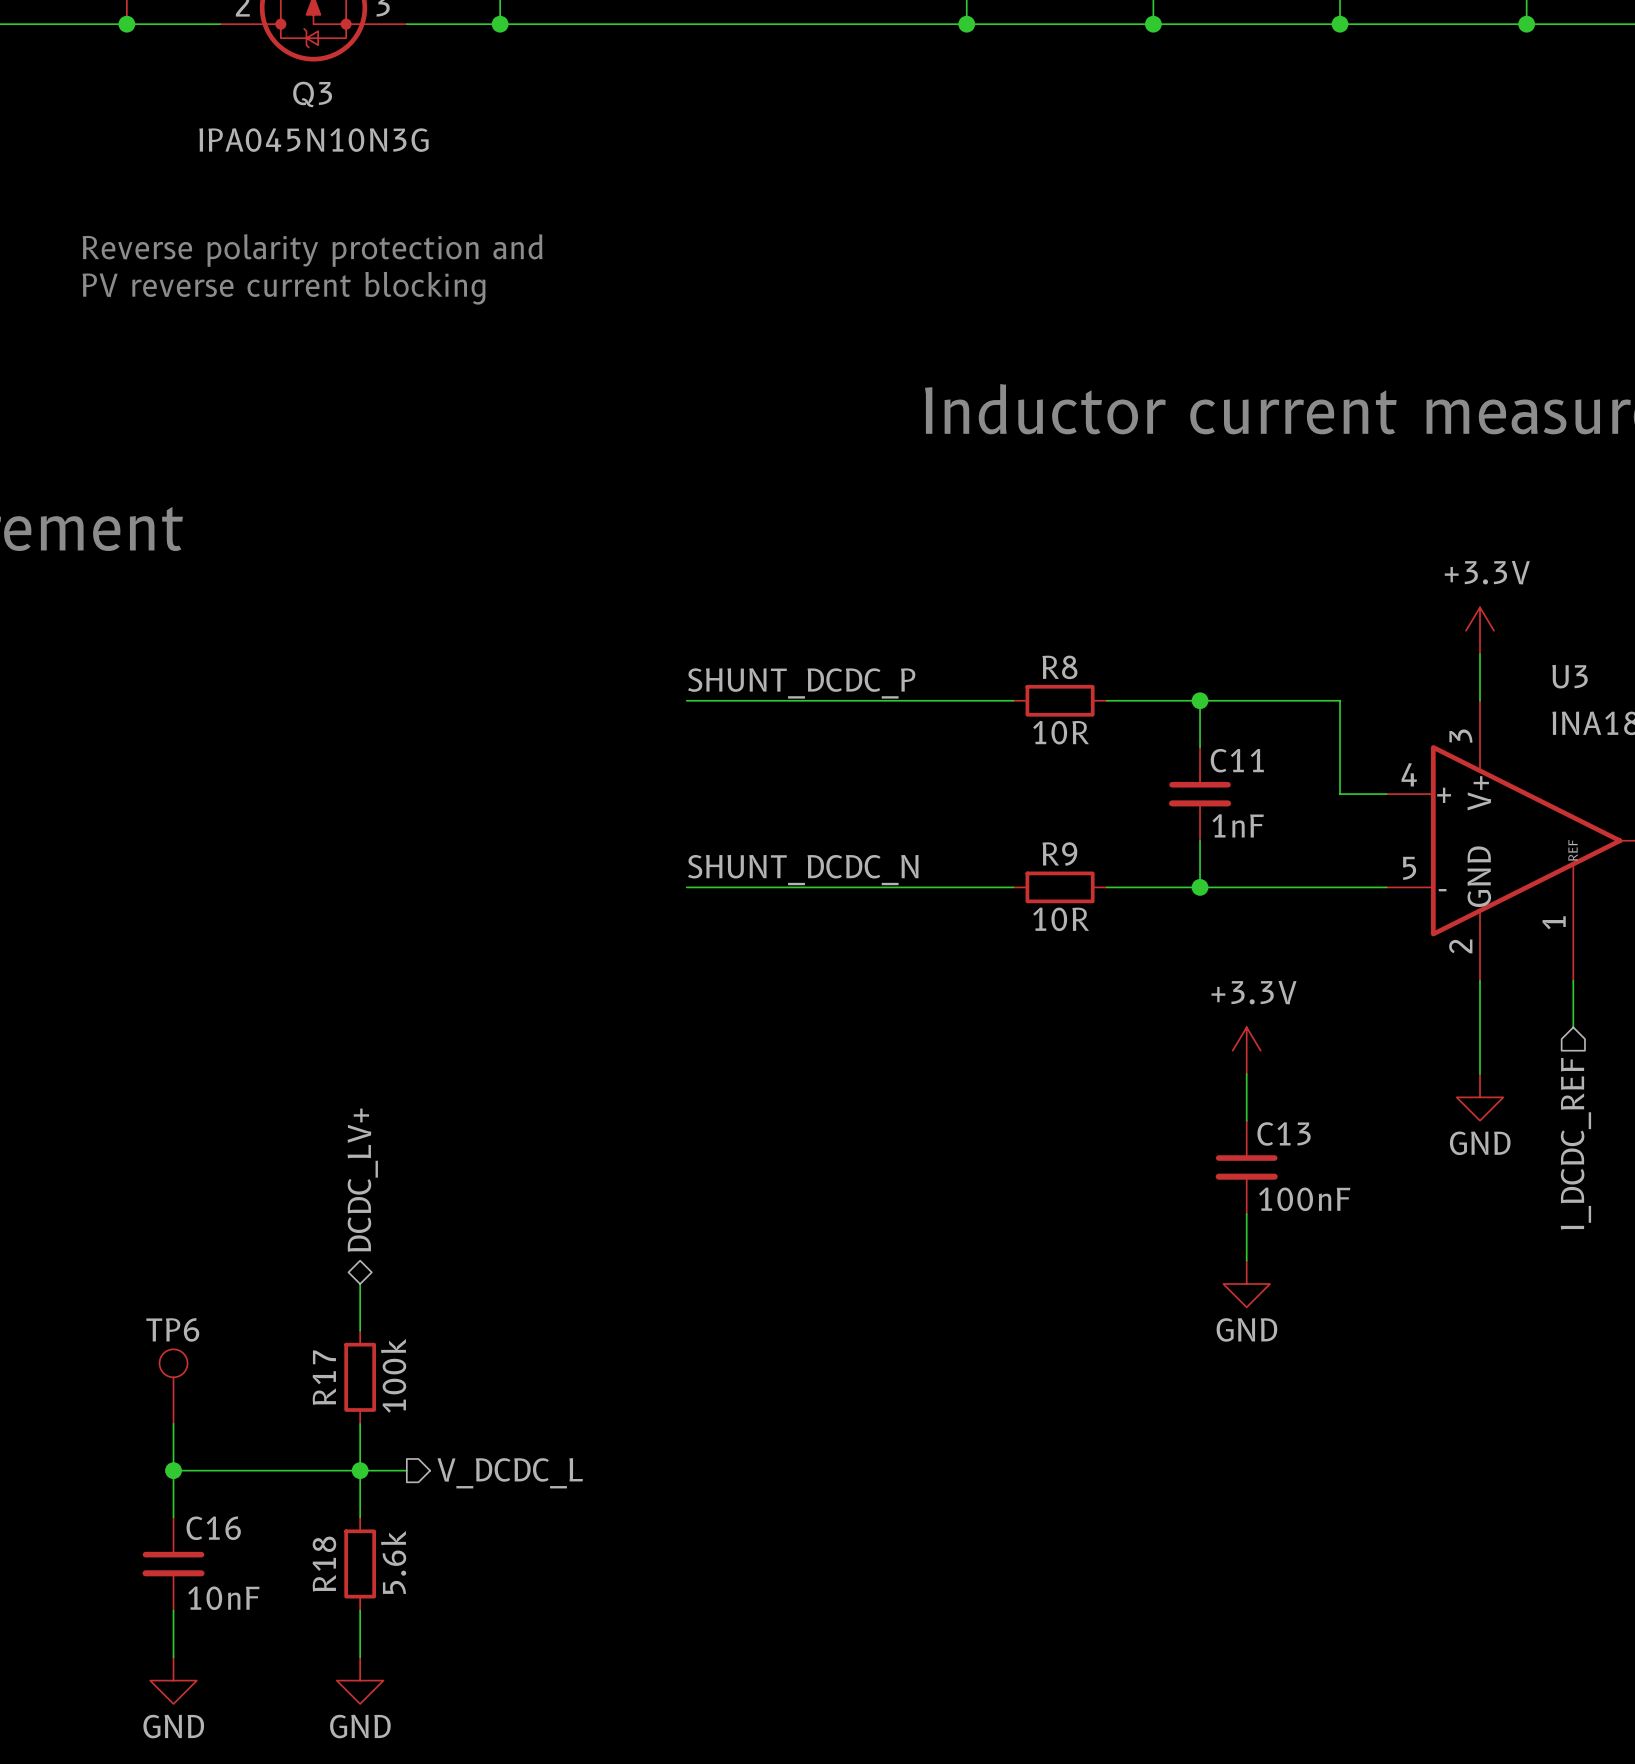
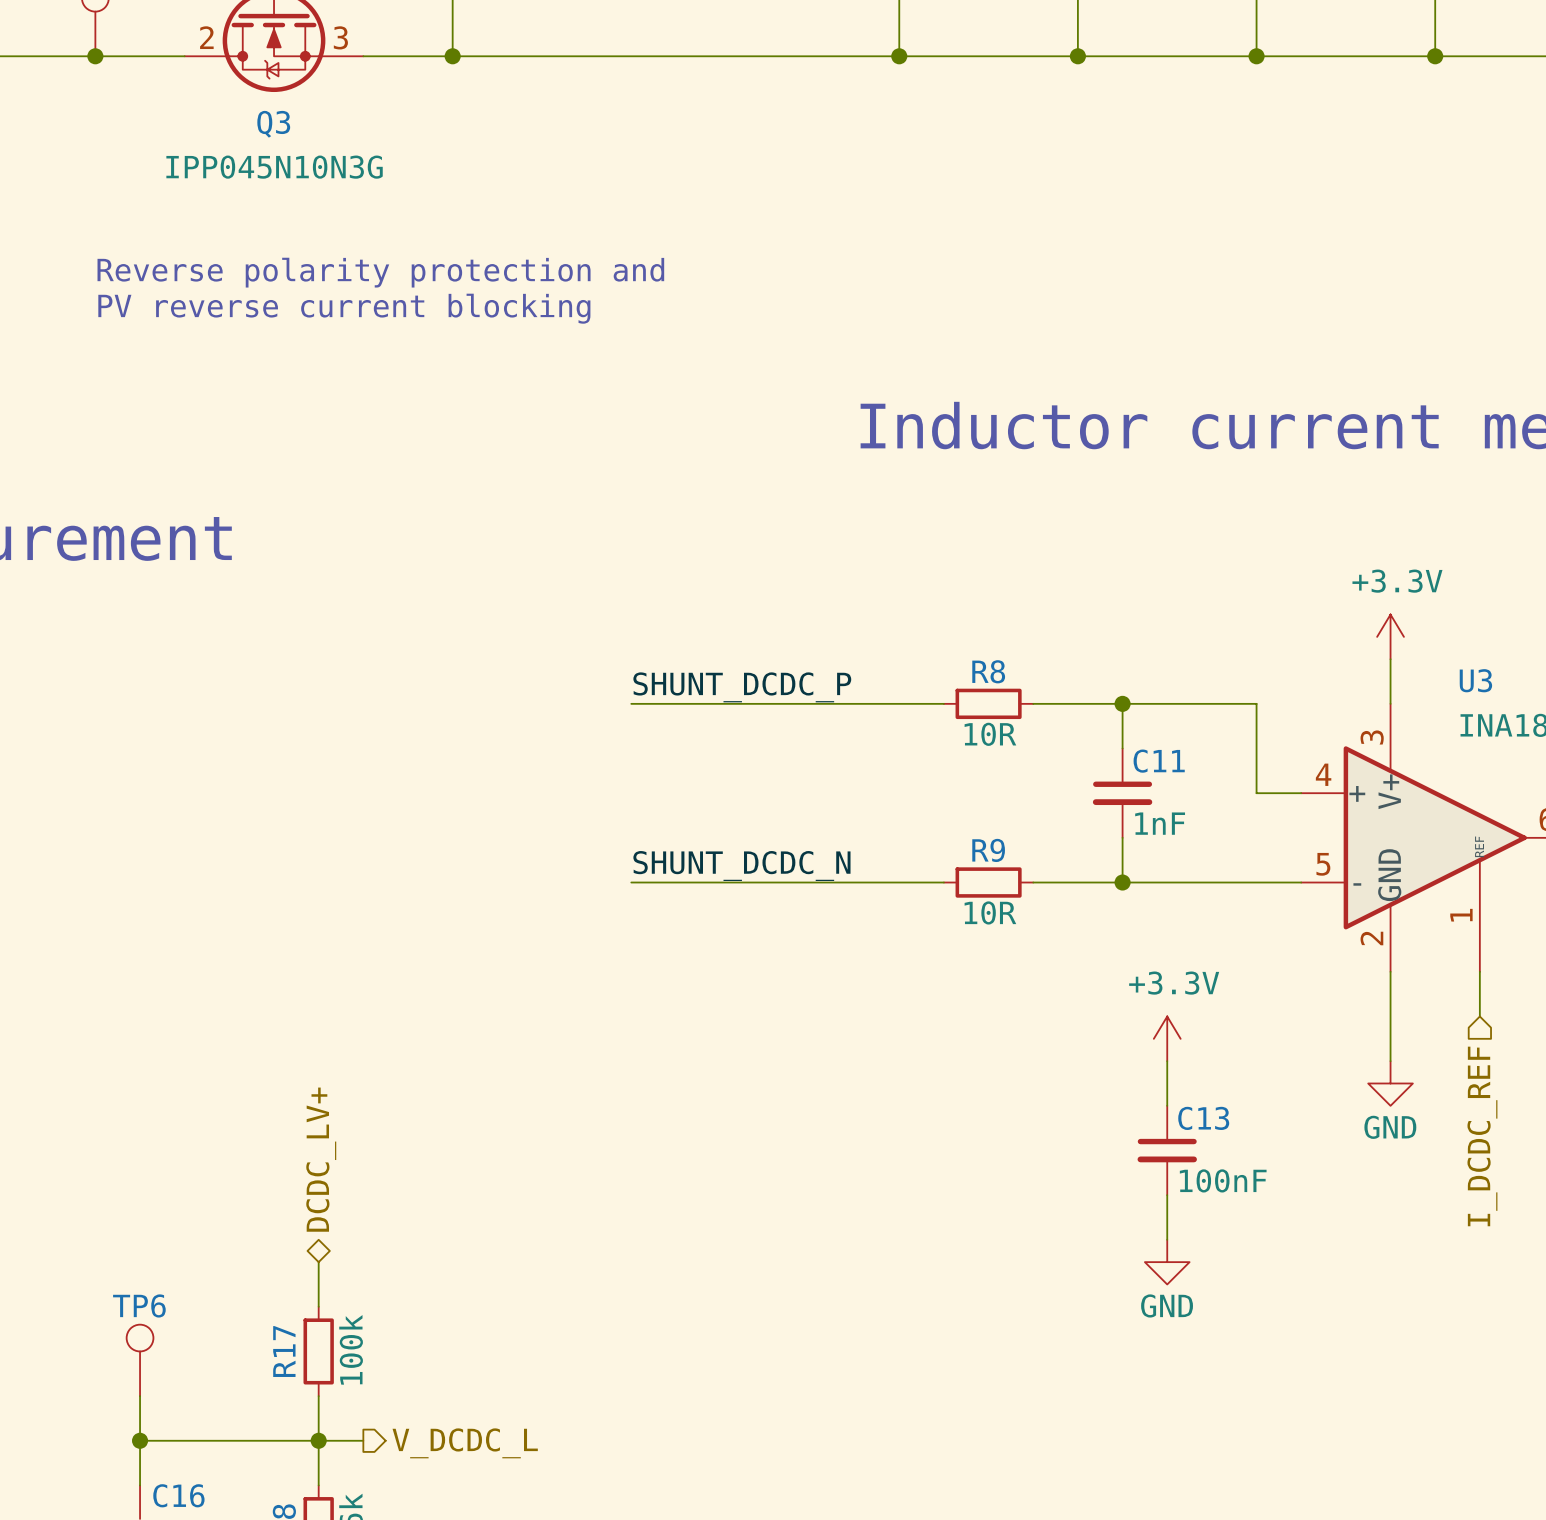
Q3 value: IPA045N10N3G (313, 140) -> IPP045N10N3G (274, 167)
text position: Reverse polarity protection and (312, 250) -> Reverse polarity protection and (380, 272)
text position: PV reverse current blocking (283, 288) -> PV reverse current blocking (344, 308)

